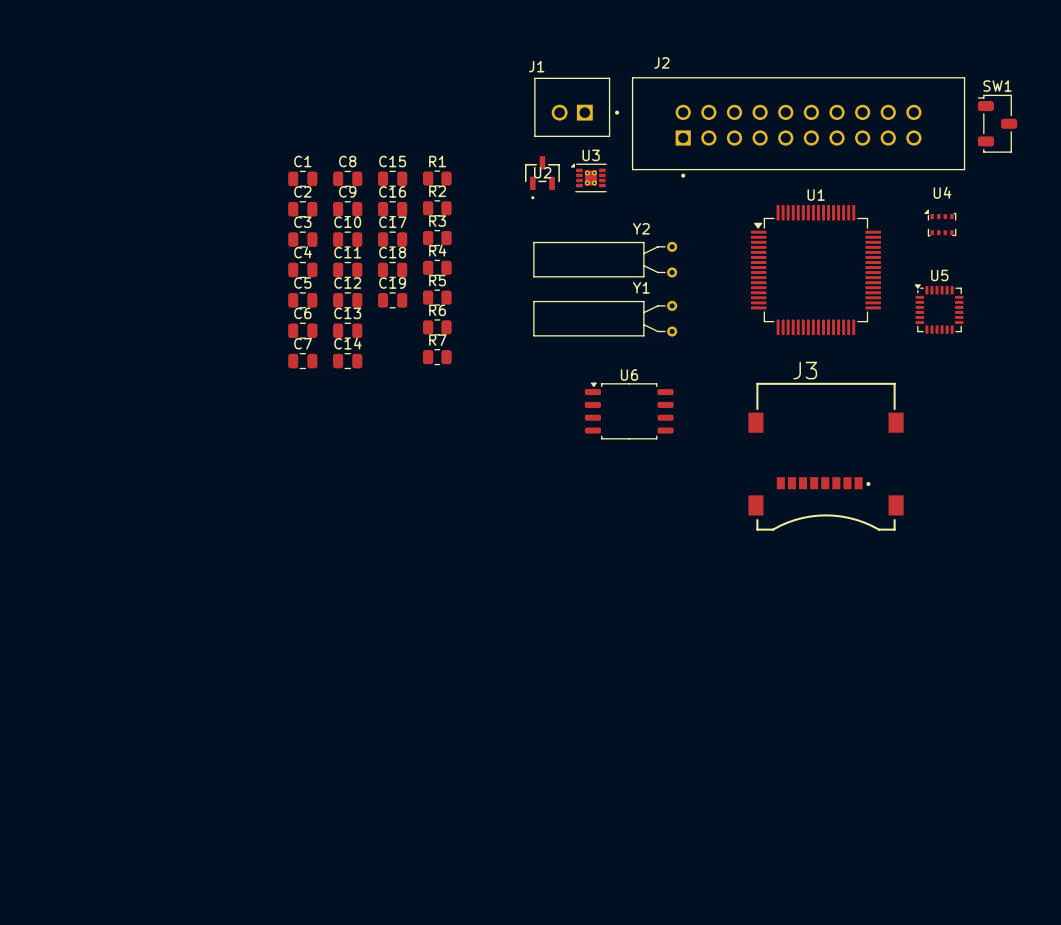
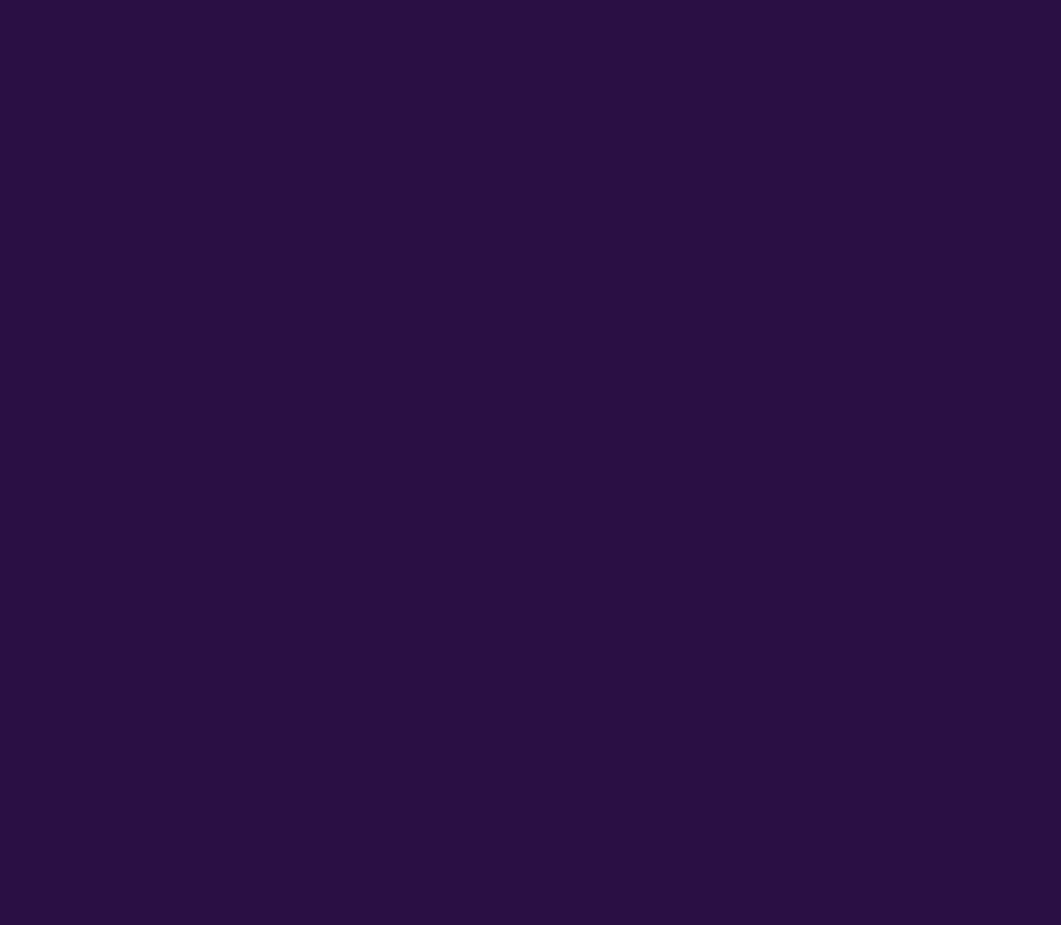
J1: (576, 107) -> none
SW1: (997, 123) -> none
J2: (798, 127) -> none
U2: (542, 177) -> none
U3: (588, 177) -> none
C1: (302, 178) -> none
C8: (347, 178) -> none
C15: (392, 178) -> none
R1: (437, 178) -> none
R2: (437, 208) -> none
C2: (302, 209) -> none
C9: (347, 209) -> none
C16: (392, 209) -> none
U4: (940, 222) -> none
R3: (437, 238) -> none
C3: (302, 239) -> none
C10: (347, 239) -> none
C17: (392, 239) -> none
Y2: (605, 259) -> none
R4: (437, 267) -> none
C4: (302, 269) -> none
C11: (347, 269) -> none
C18: (392, 269) -> none
U1: (815, 270) -> none
R5: (437, 297) -> none
C5: (302, 300) -> none
C12: (347, 300) -> none
C19: (392, 300) -> none
U5: (939, 309) -> none
Y1: (605, 318) -> none
R6: (437, 327) -> none
C6: (302, 330) -> none
C13: (347, 330) -> none
R7: (437, 357) -> none
C7: (302, 361) -> none
C14: (347, 361) -> none
U6: (629, 410) -> none
J3: (826, 456) -> none

